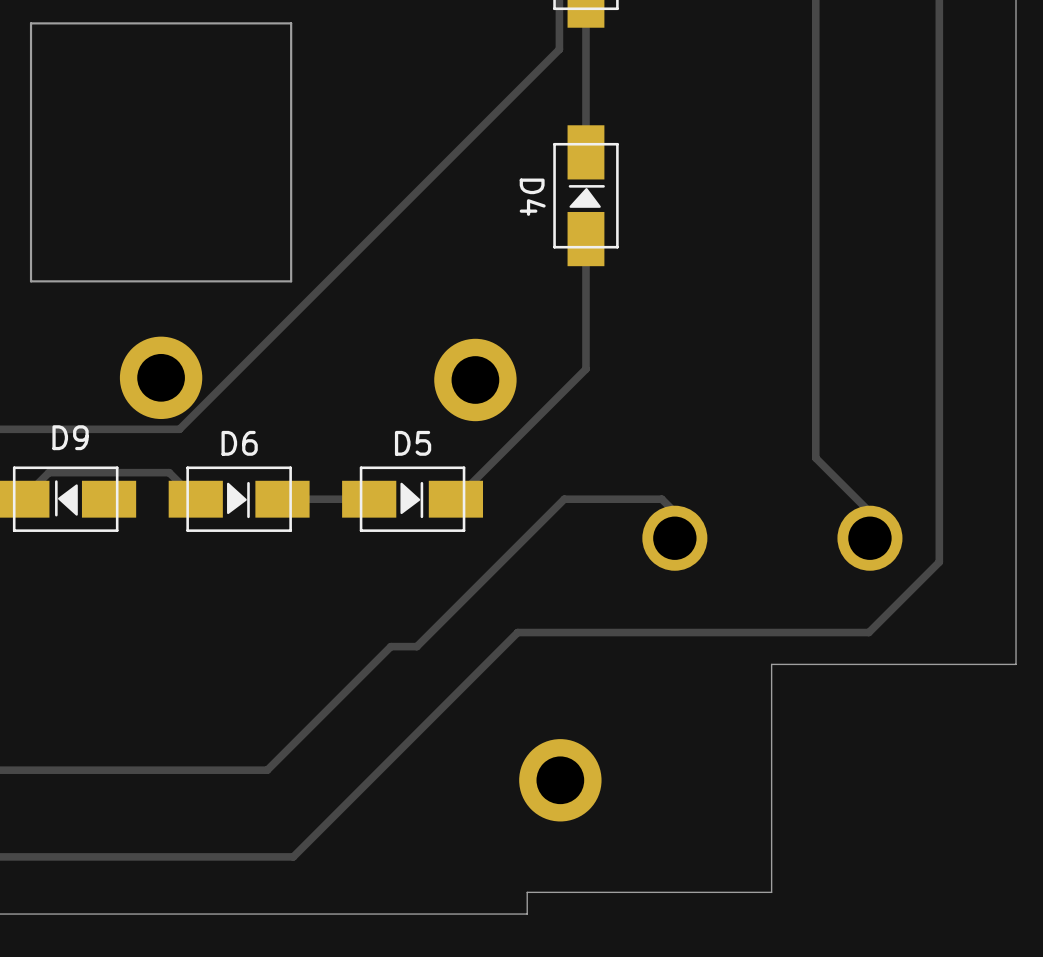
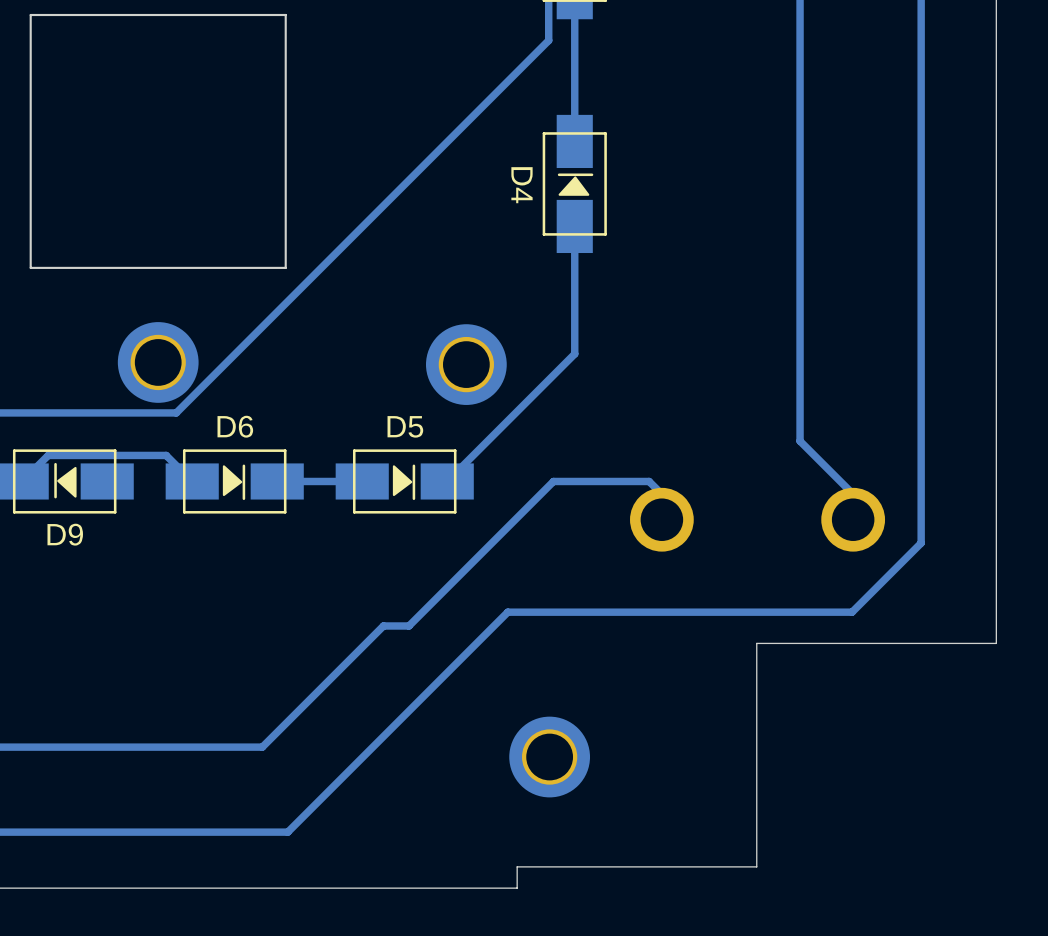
D9 name position: D9 (70, 437) -> D9 (65, 534)

